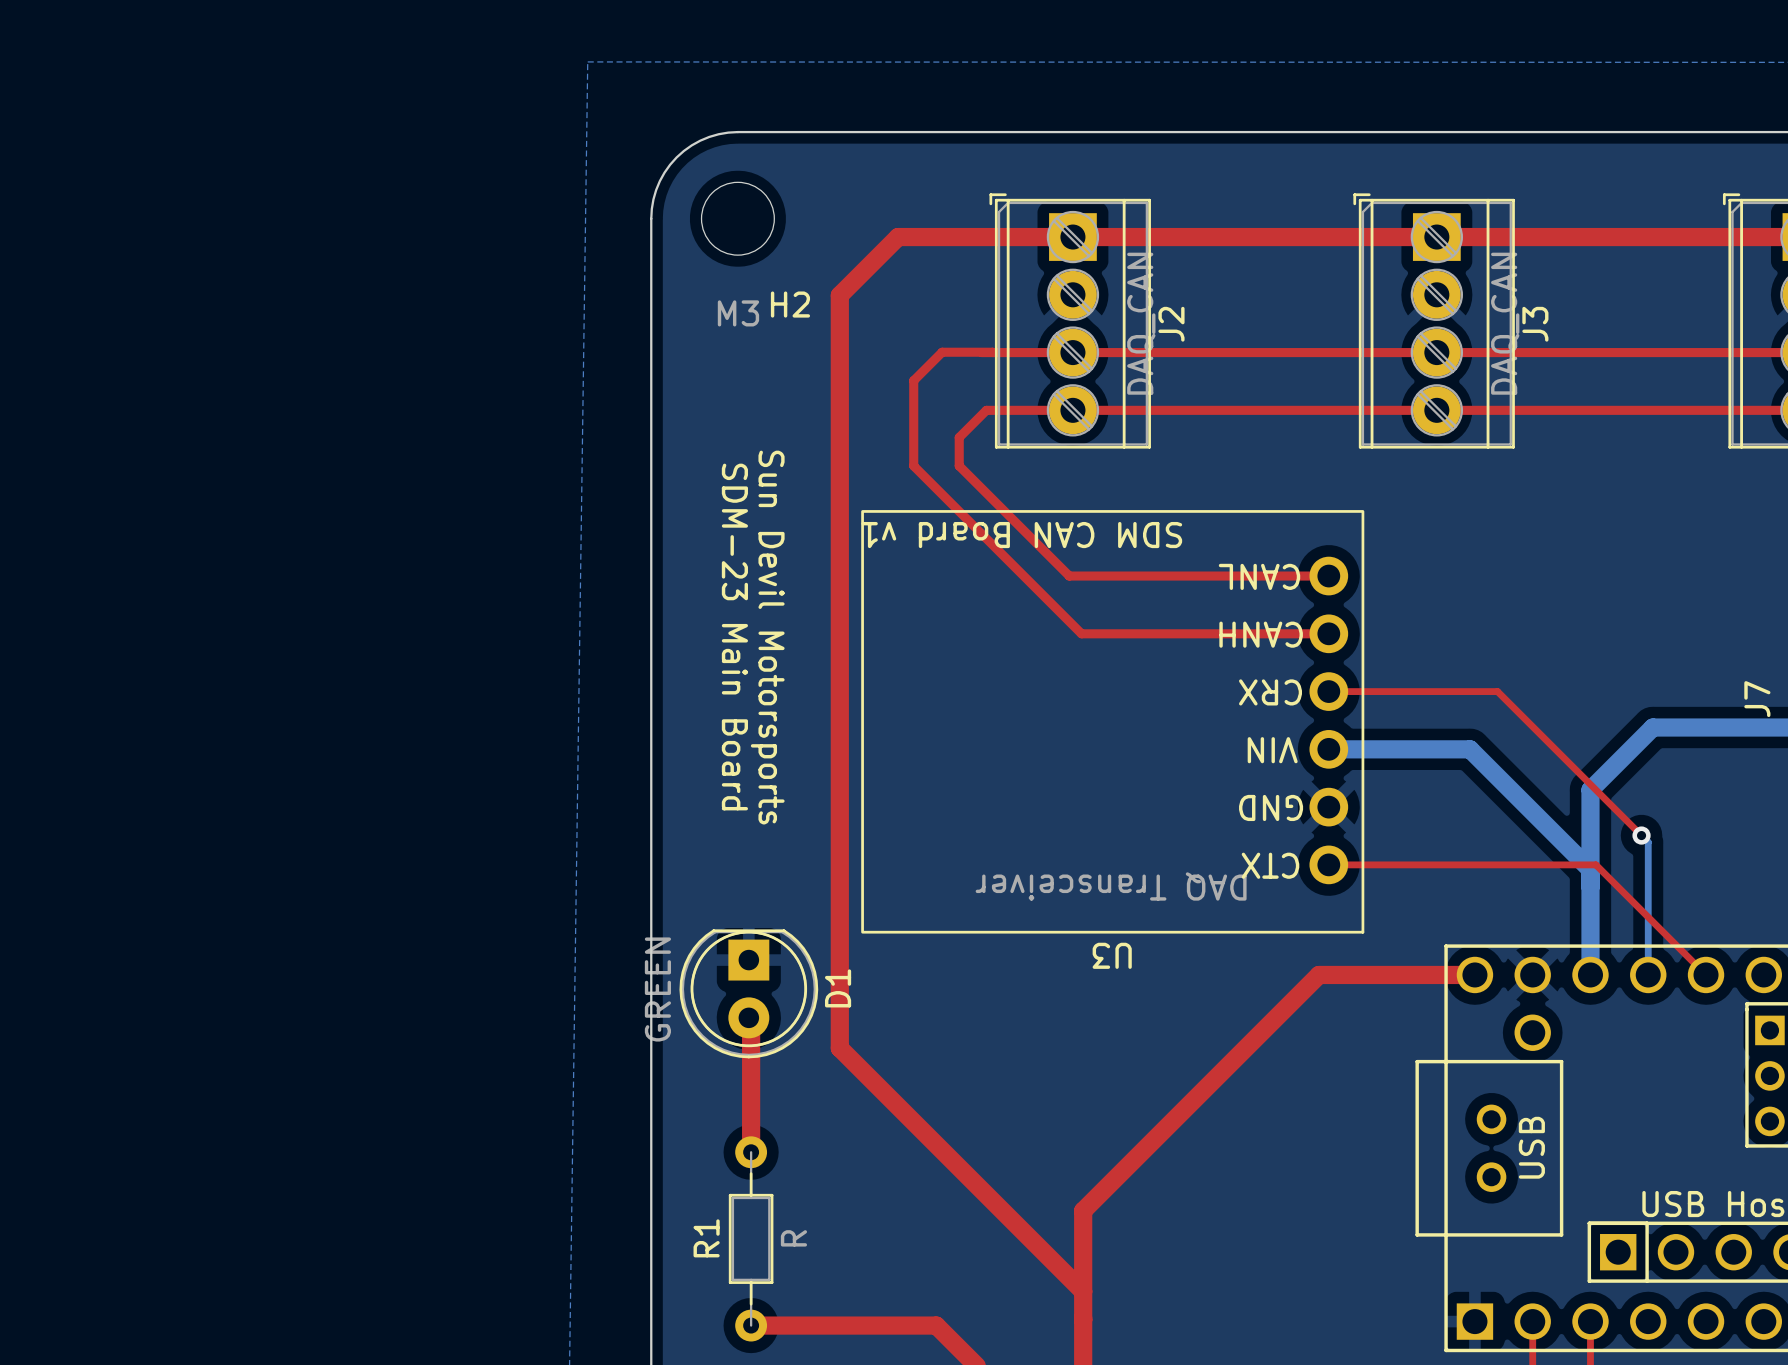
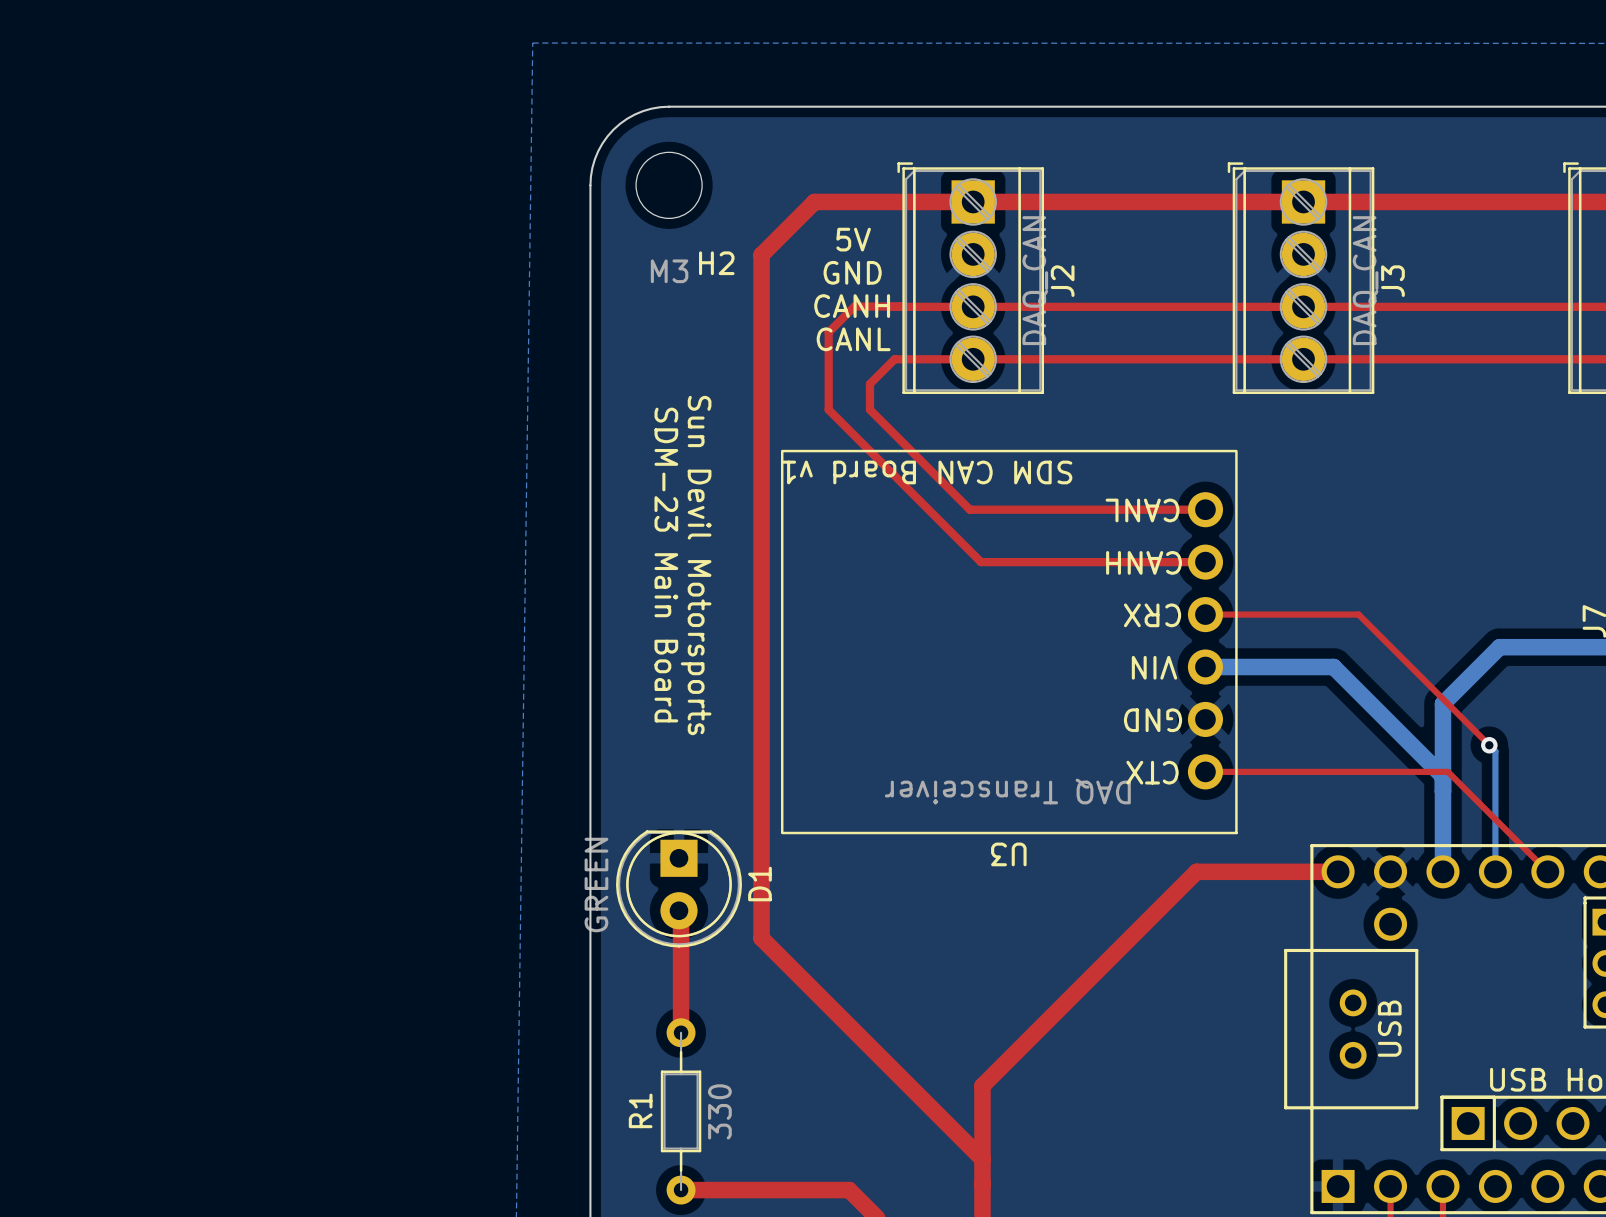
text: none -> 5V (853, 239)
text: none -> GND (852, 272)
text: none -> CANH (852, 306)
text: none -> CANL (853, 339)
R1 value: R (793, 1238) -> 330 (719, 1111)

